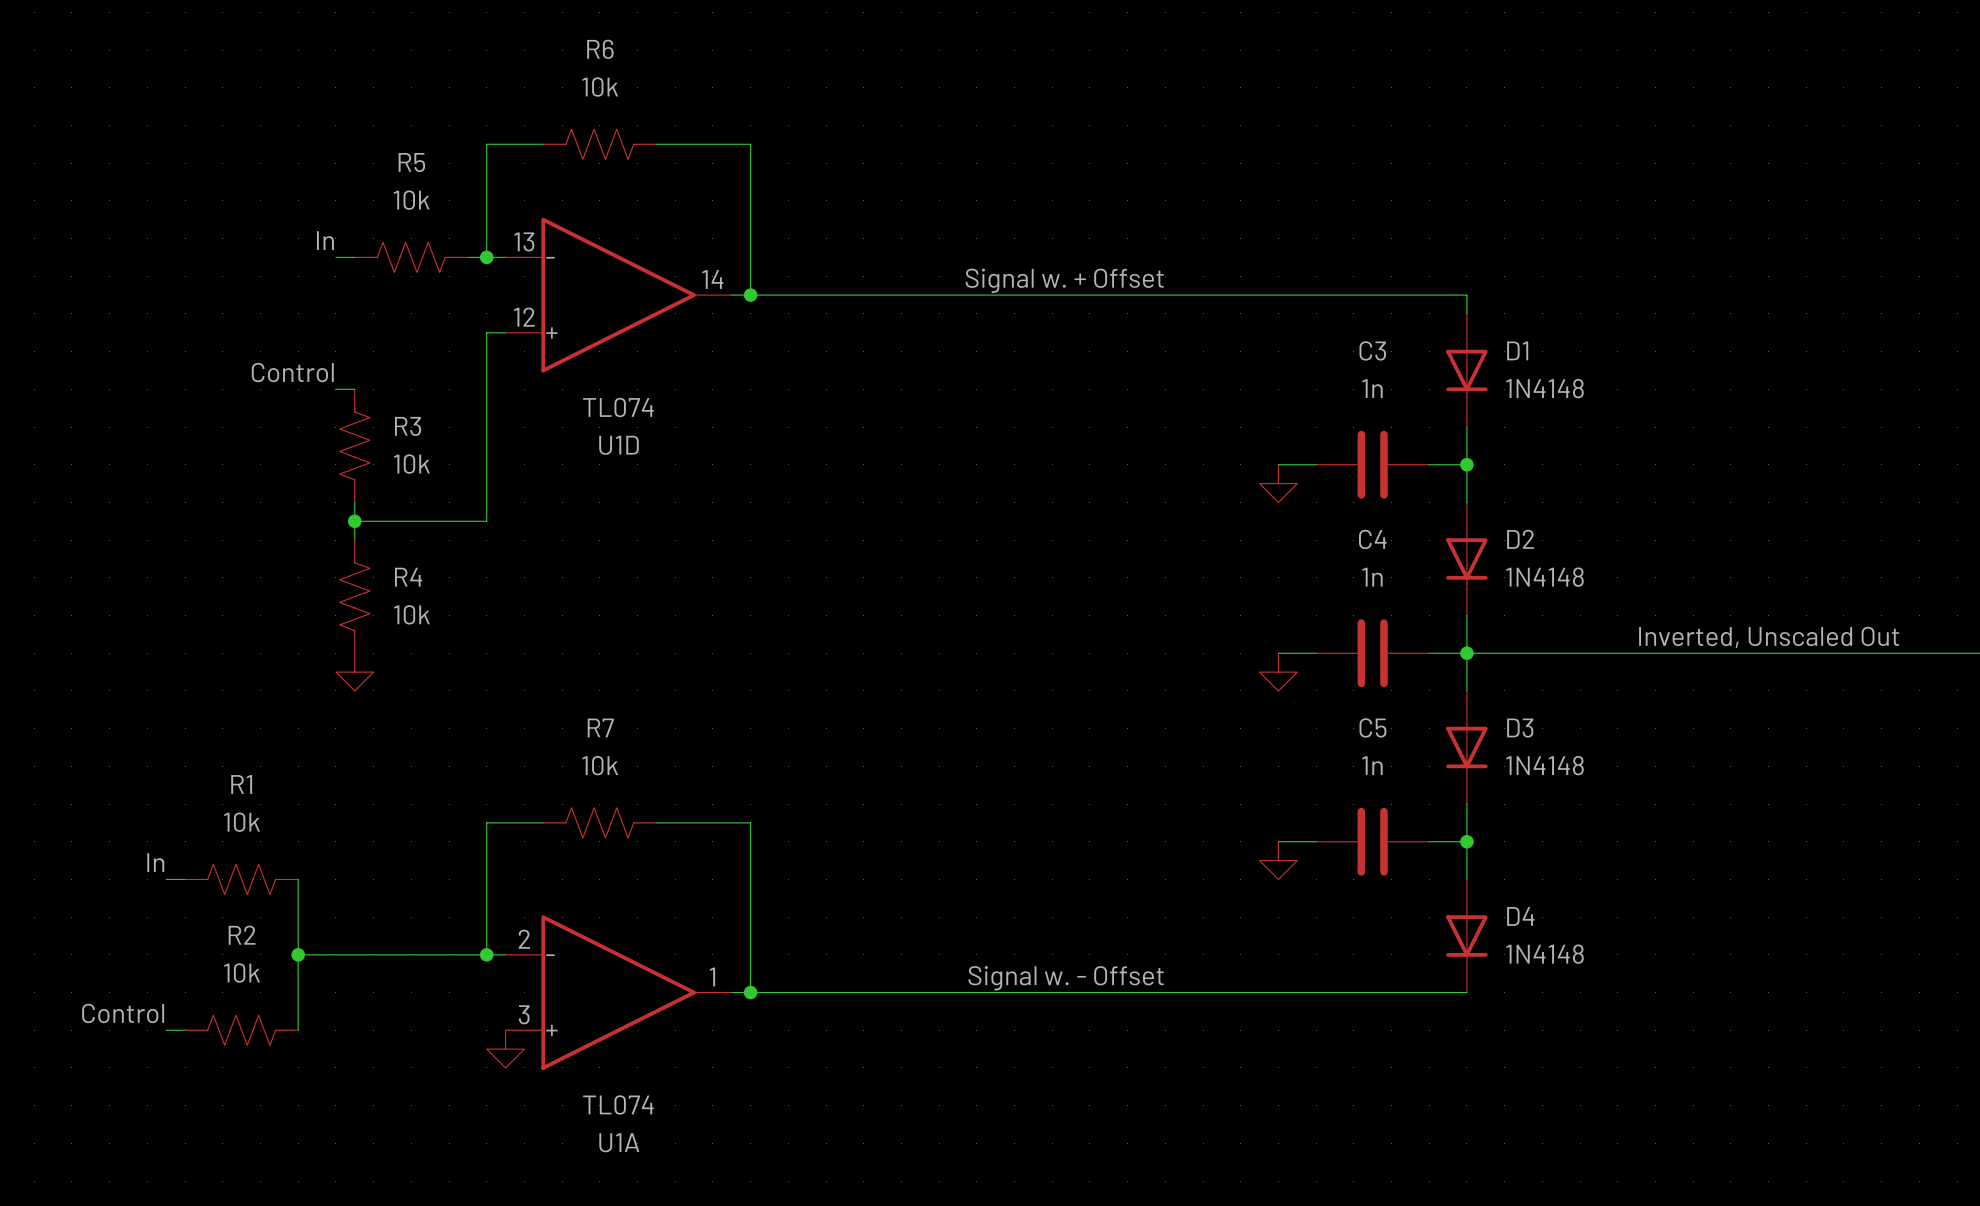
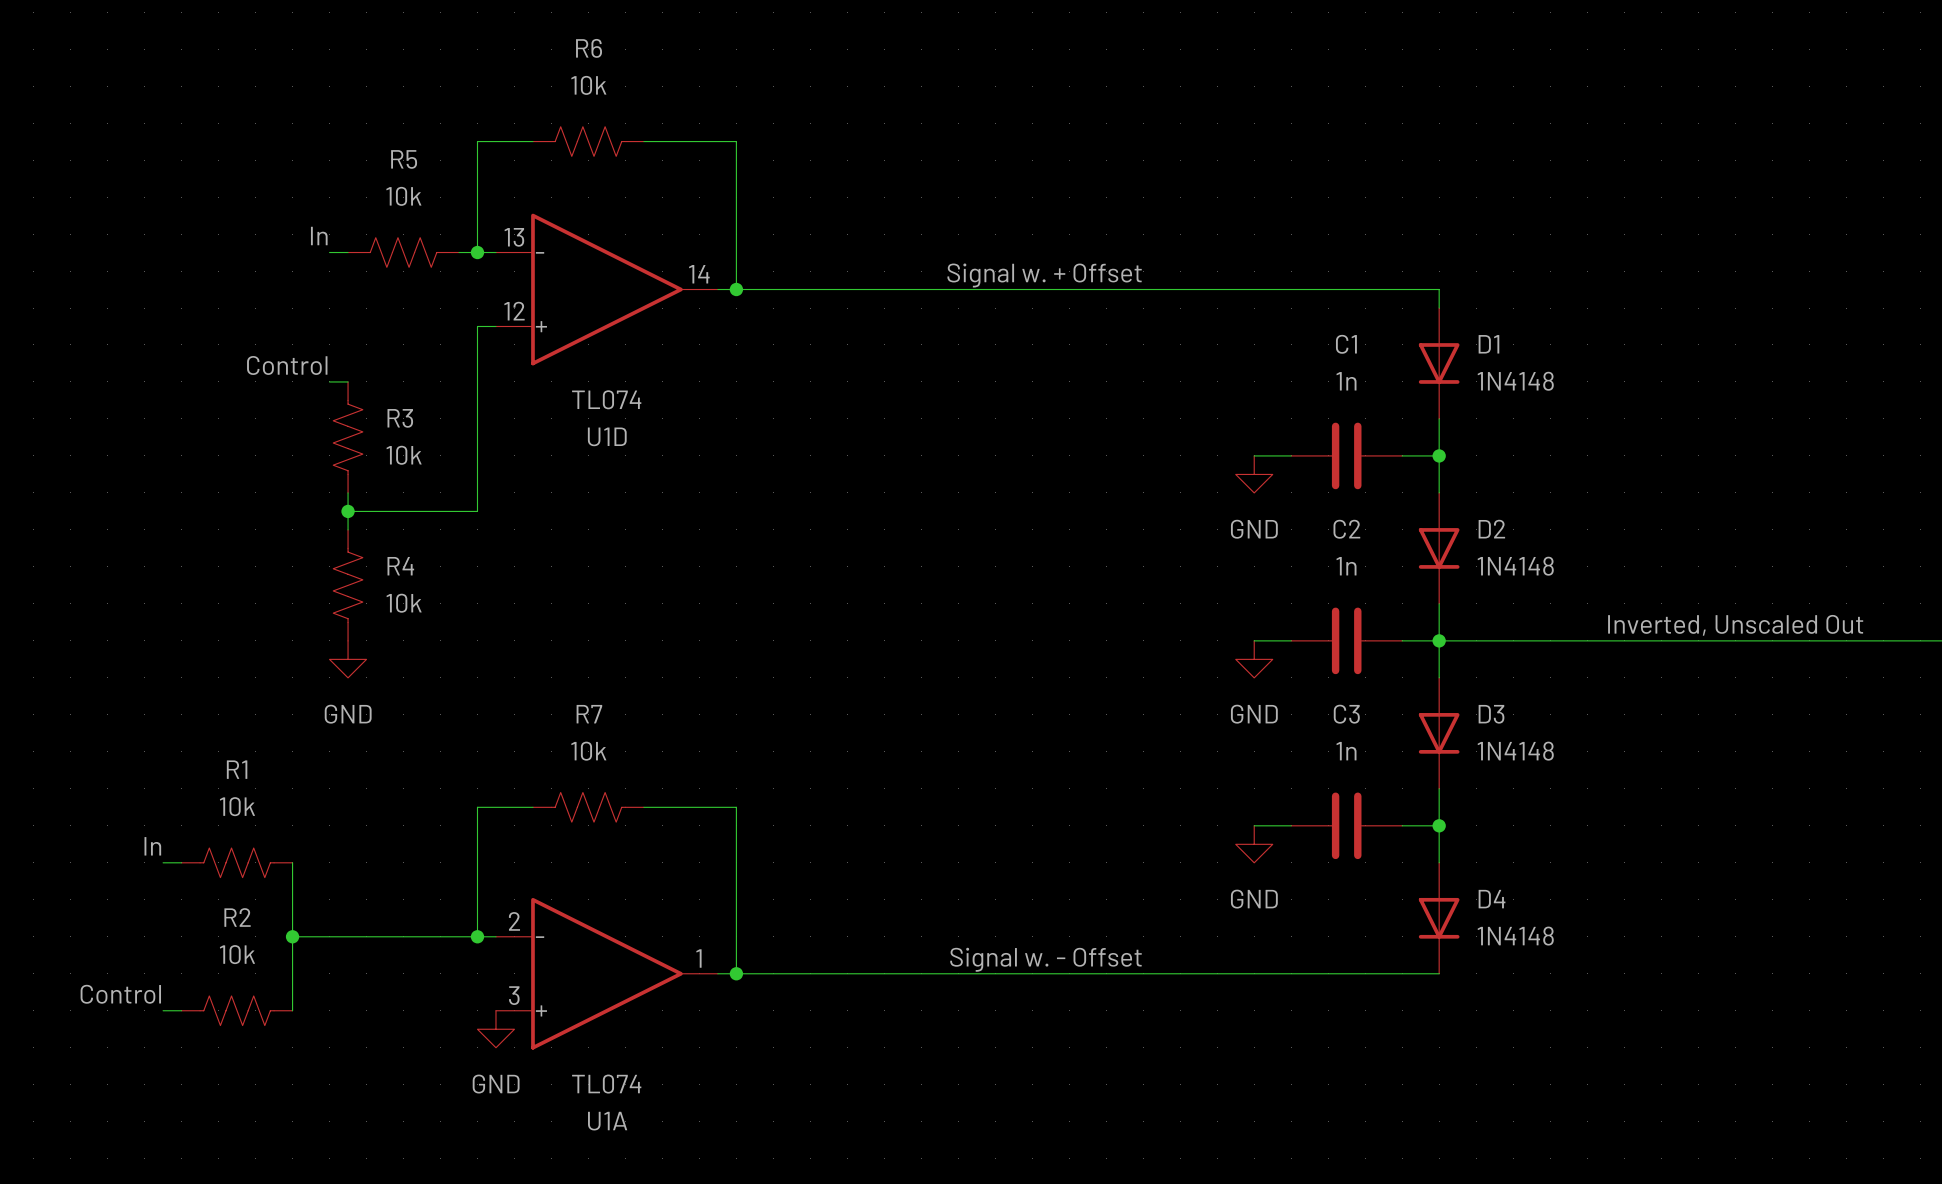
C3 name: C3 (1372, 350) -> C1 (1346, 344)
power symbol text: none -> GND (1254, 529)
C4 name: C4 (1372, 539) -> C2 (1346, 529)
power symbol text: none -> GND (348, 714)
power symbol text: none -> GND (1254, 714)
C5 name: C5 (1372, 727) -> C3 (1346, 714)
power symbol text: none -> GND (1254, 899)
power symbol text: none -> GND (496, 1084)

